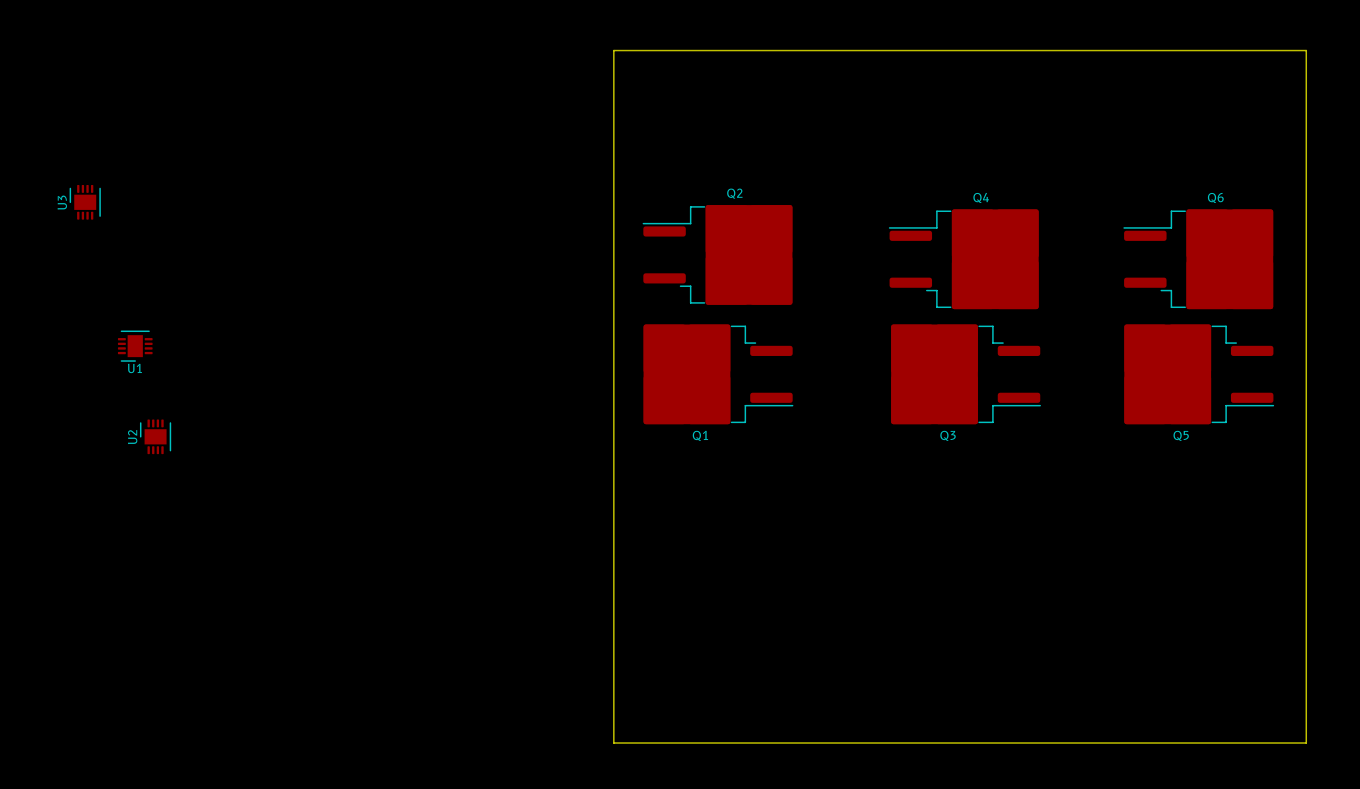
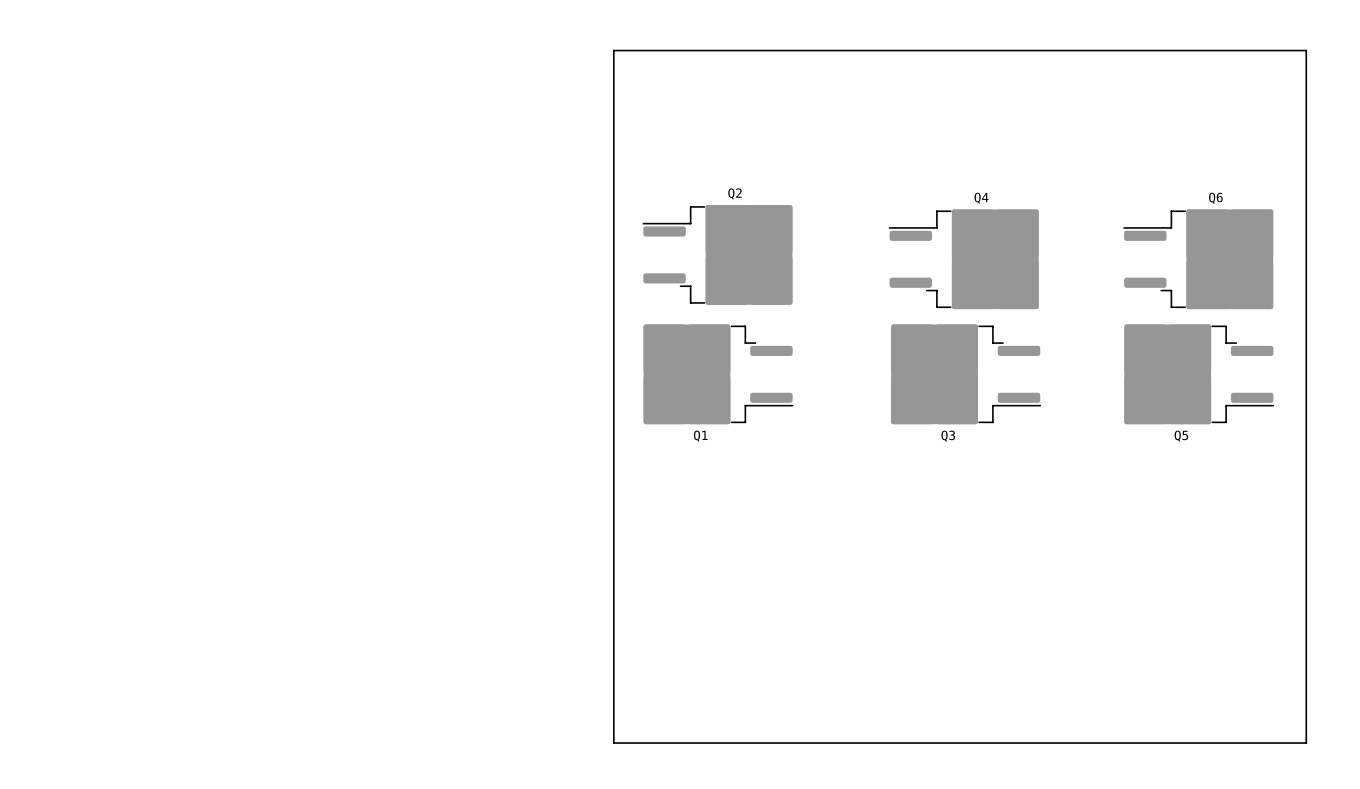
U3: (85, 202) -> none
U1: (135, 346) -> none
U2: (155, 436) -> none

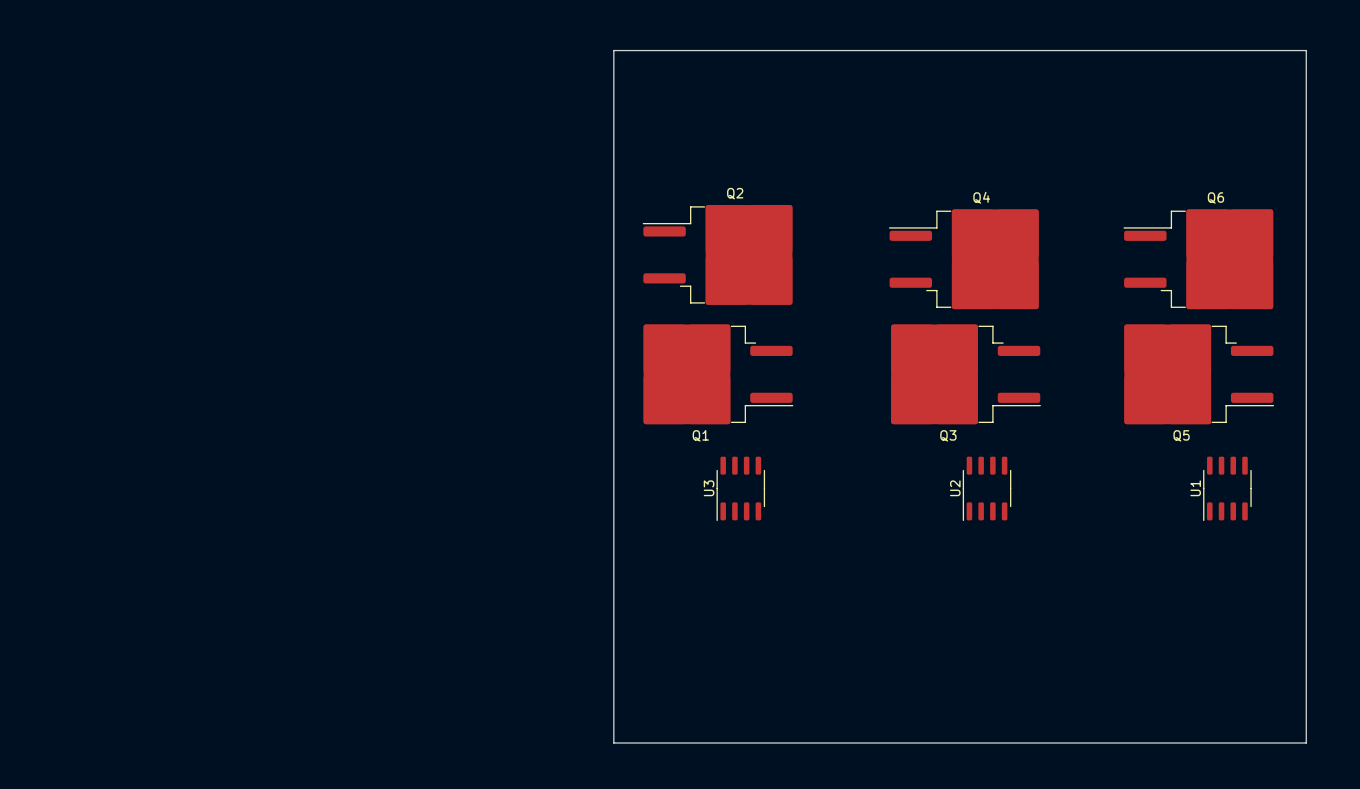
U3: none -> (740, 488)
U2: none -> (987, 488)
U1: none -> (1227, 488)

